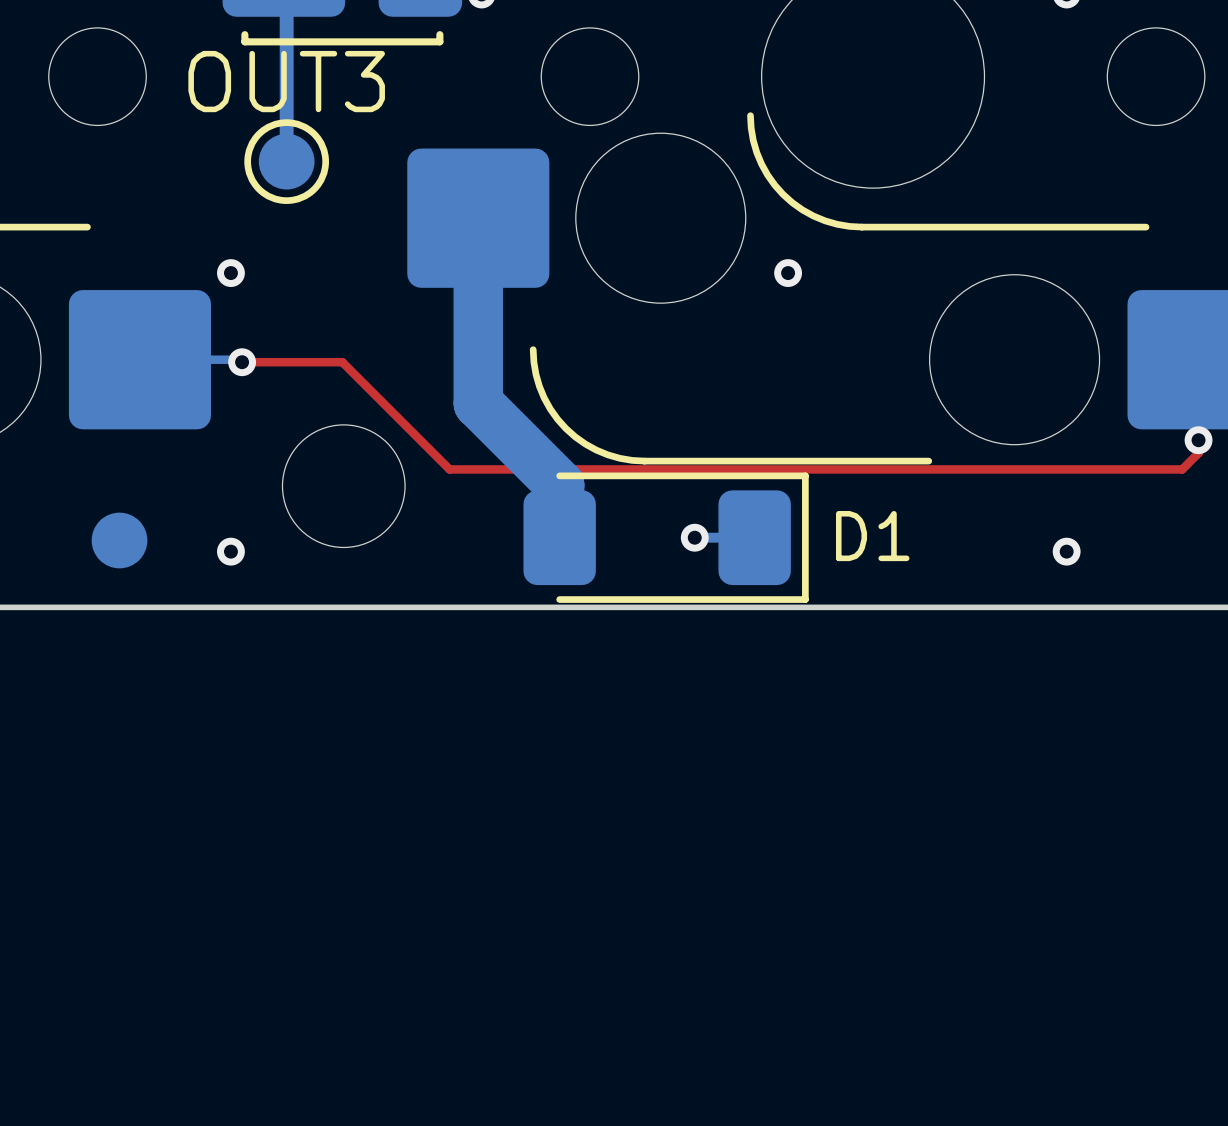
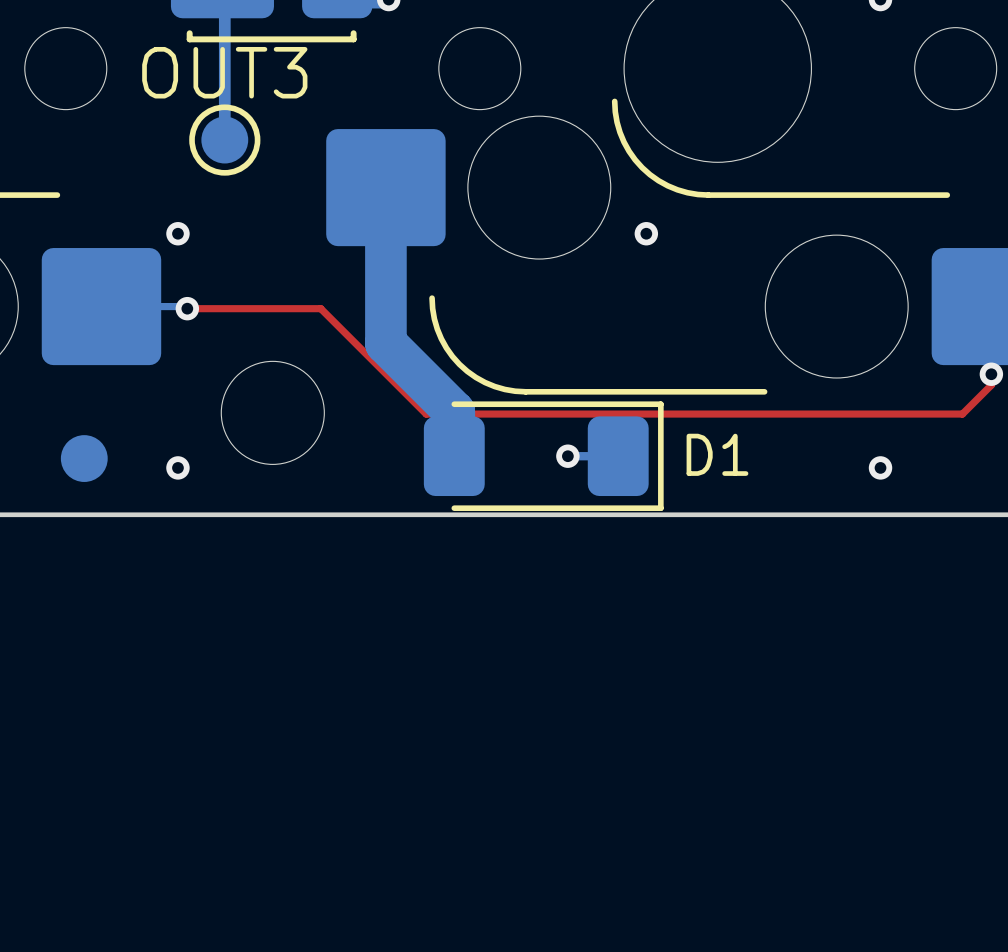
top track: (342, 362) (449, 469) (1182, 469) -> (271, 308) (320, 308) (426, 414) (962, 414) (977, 398)

